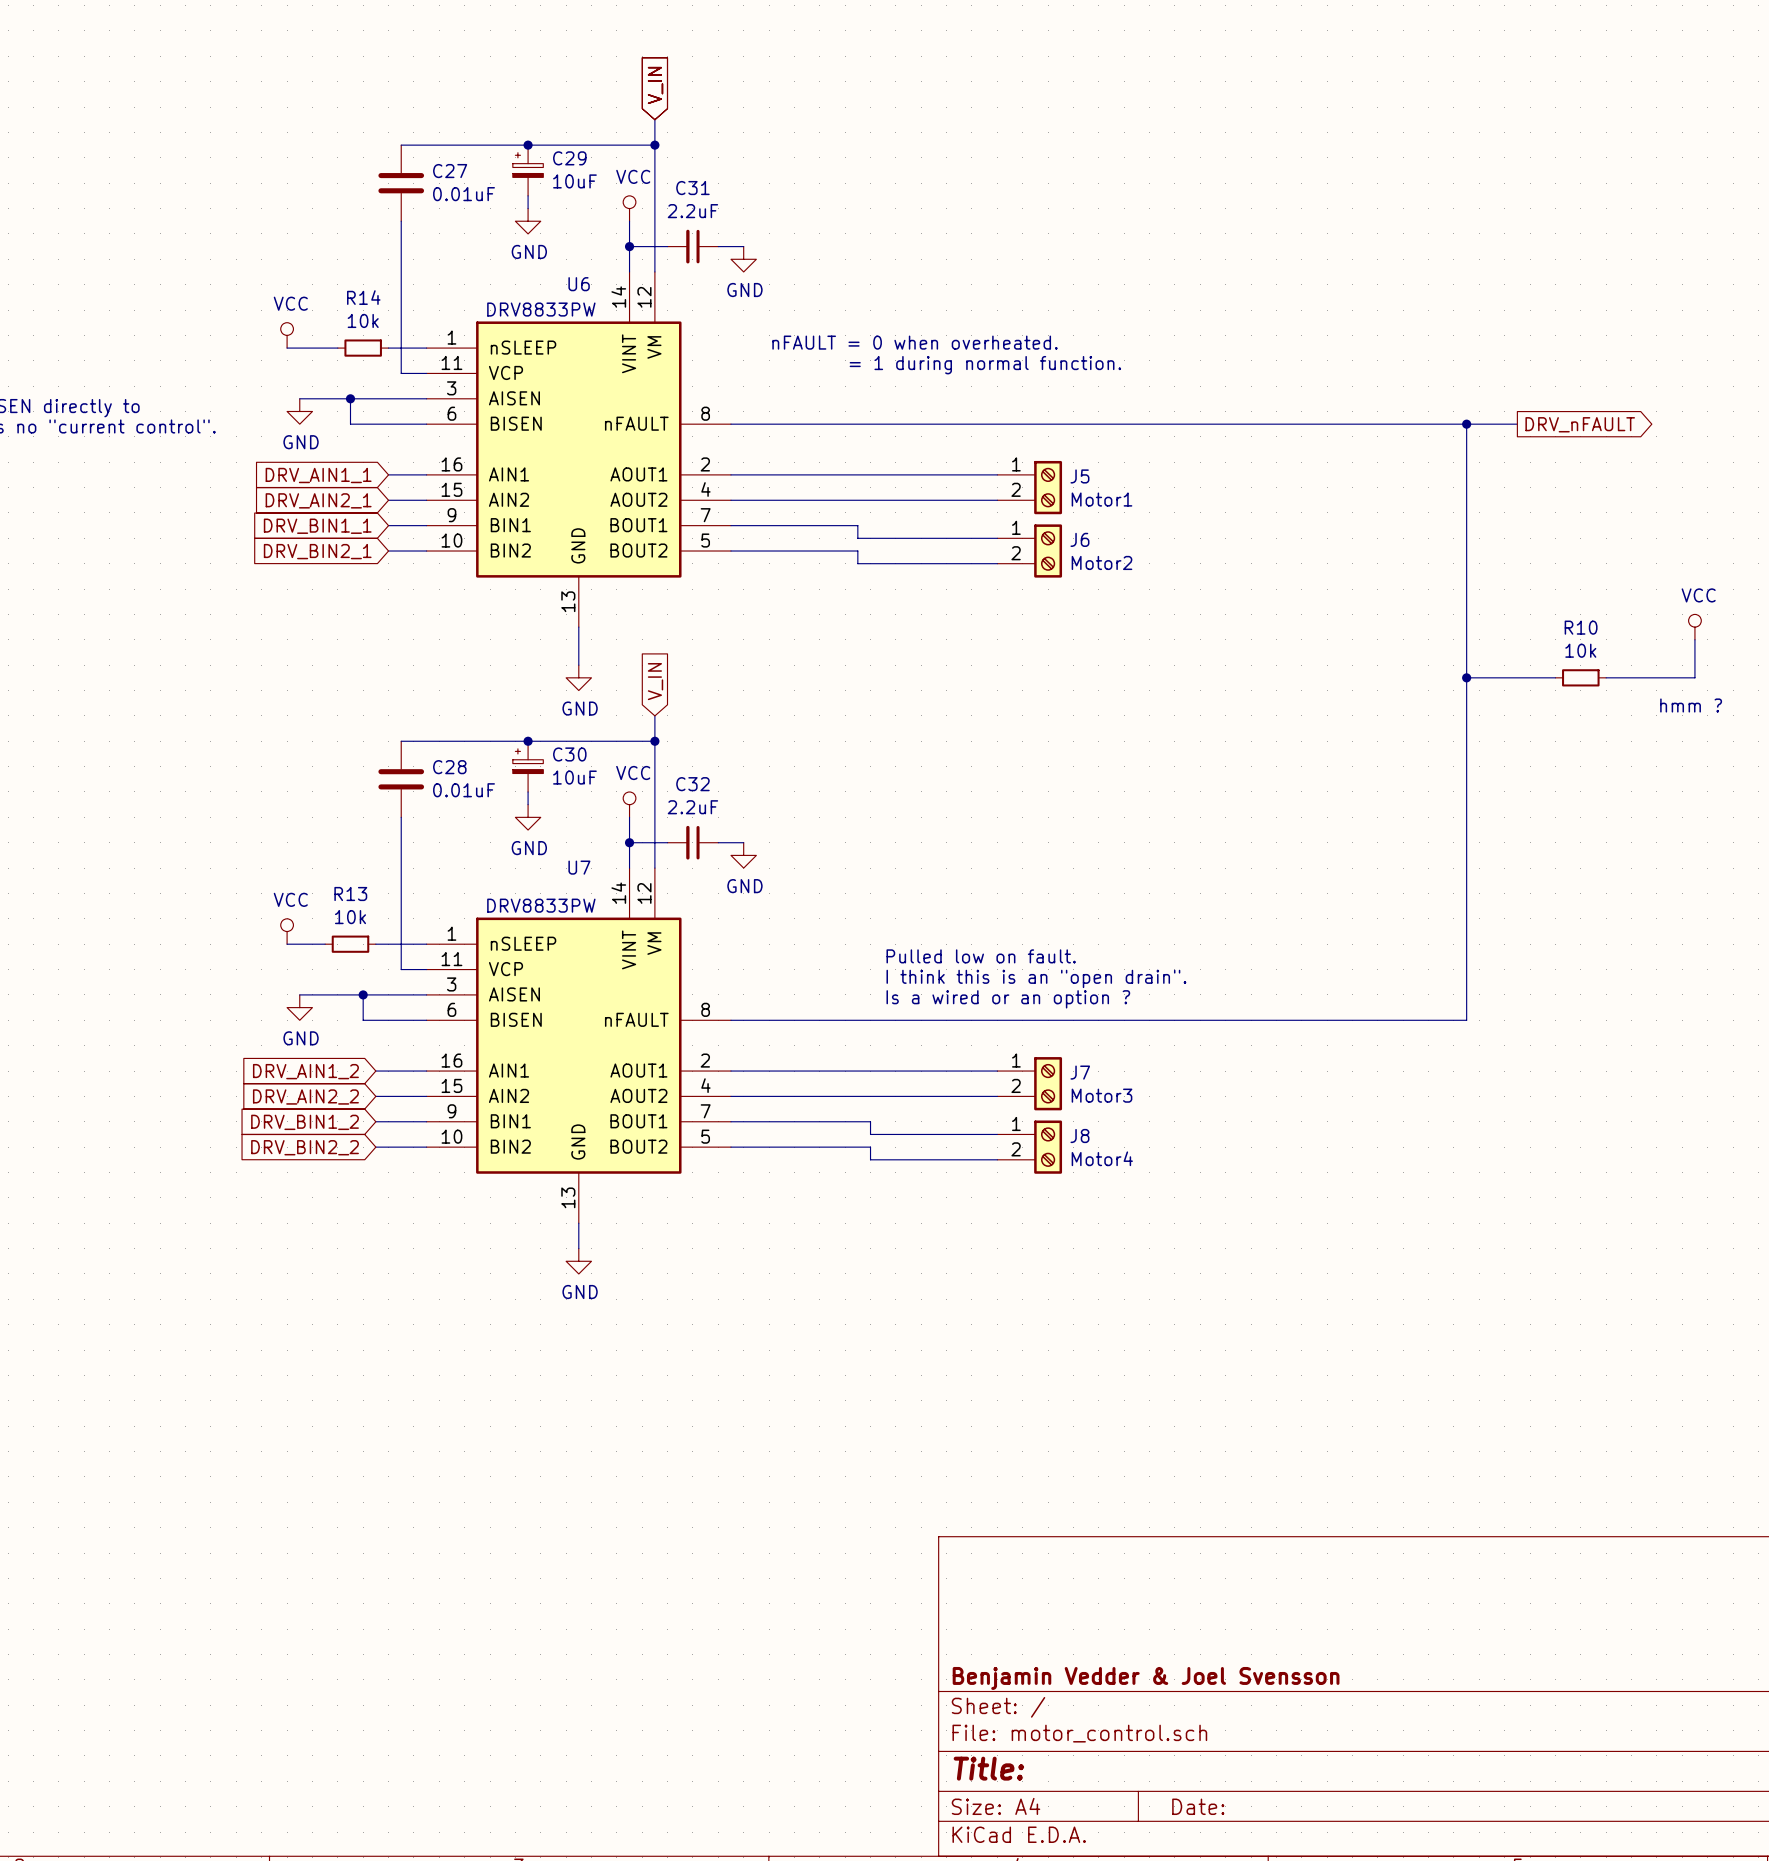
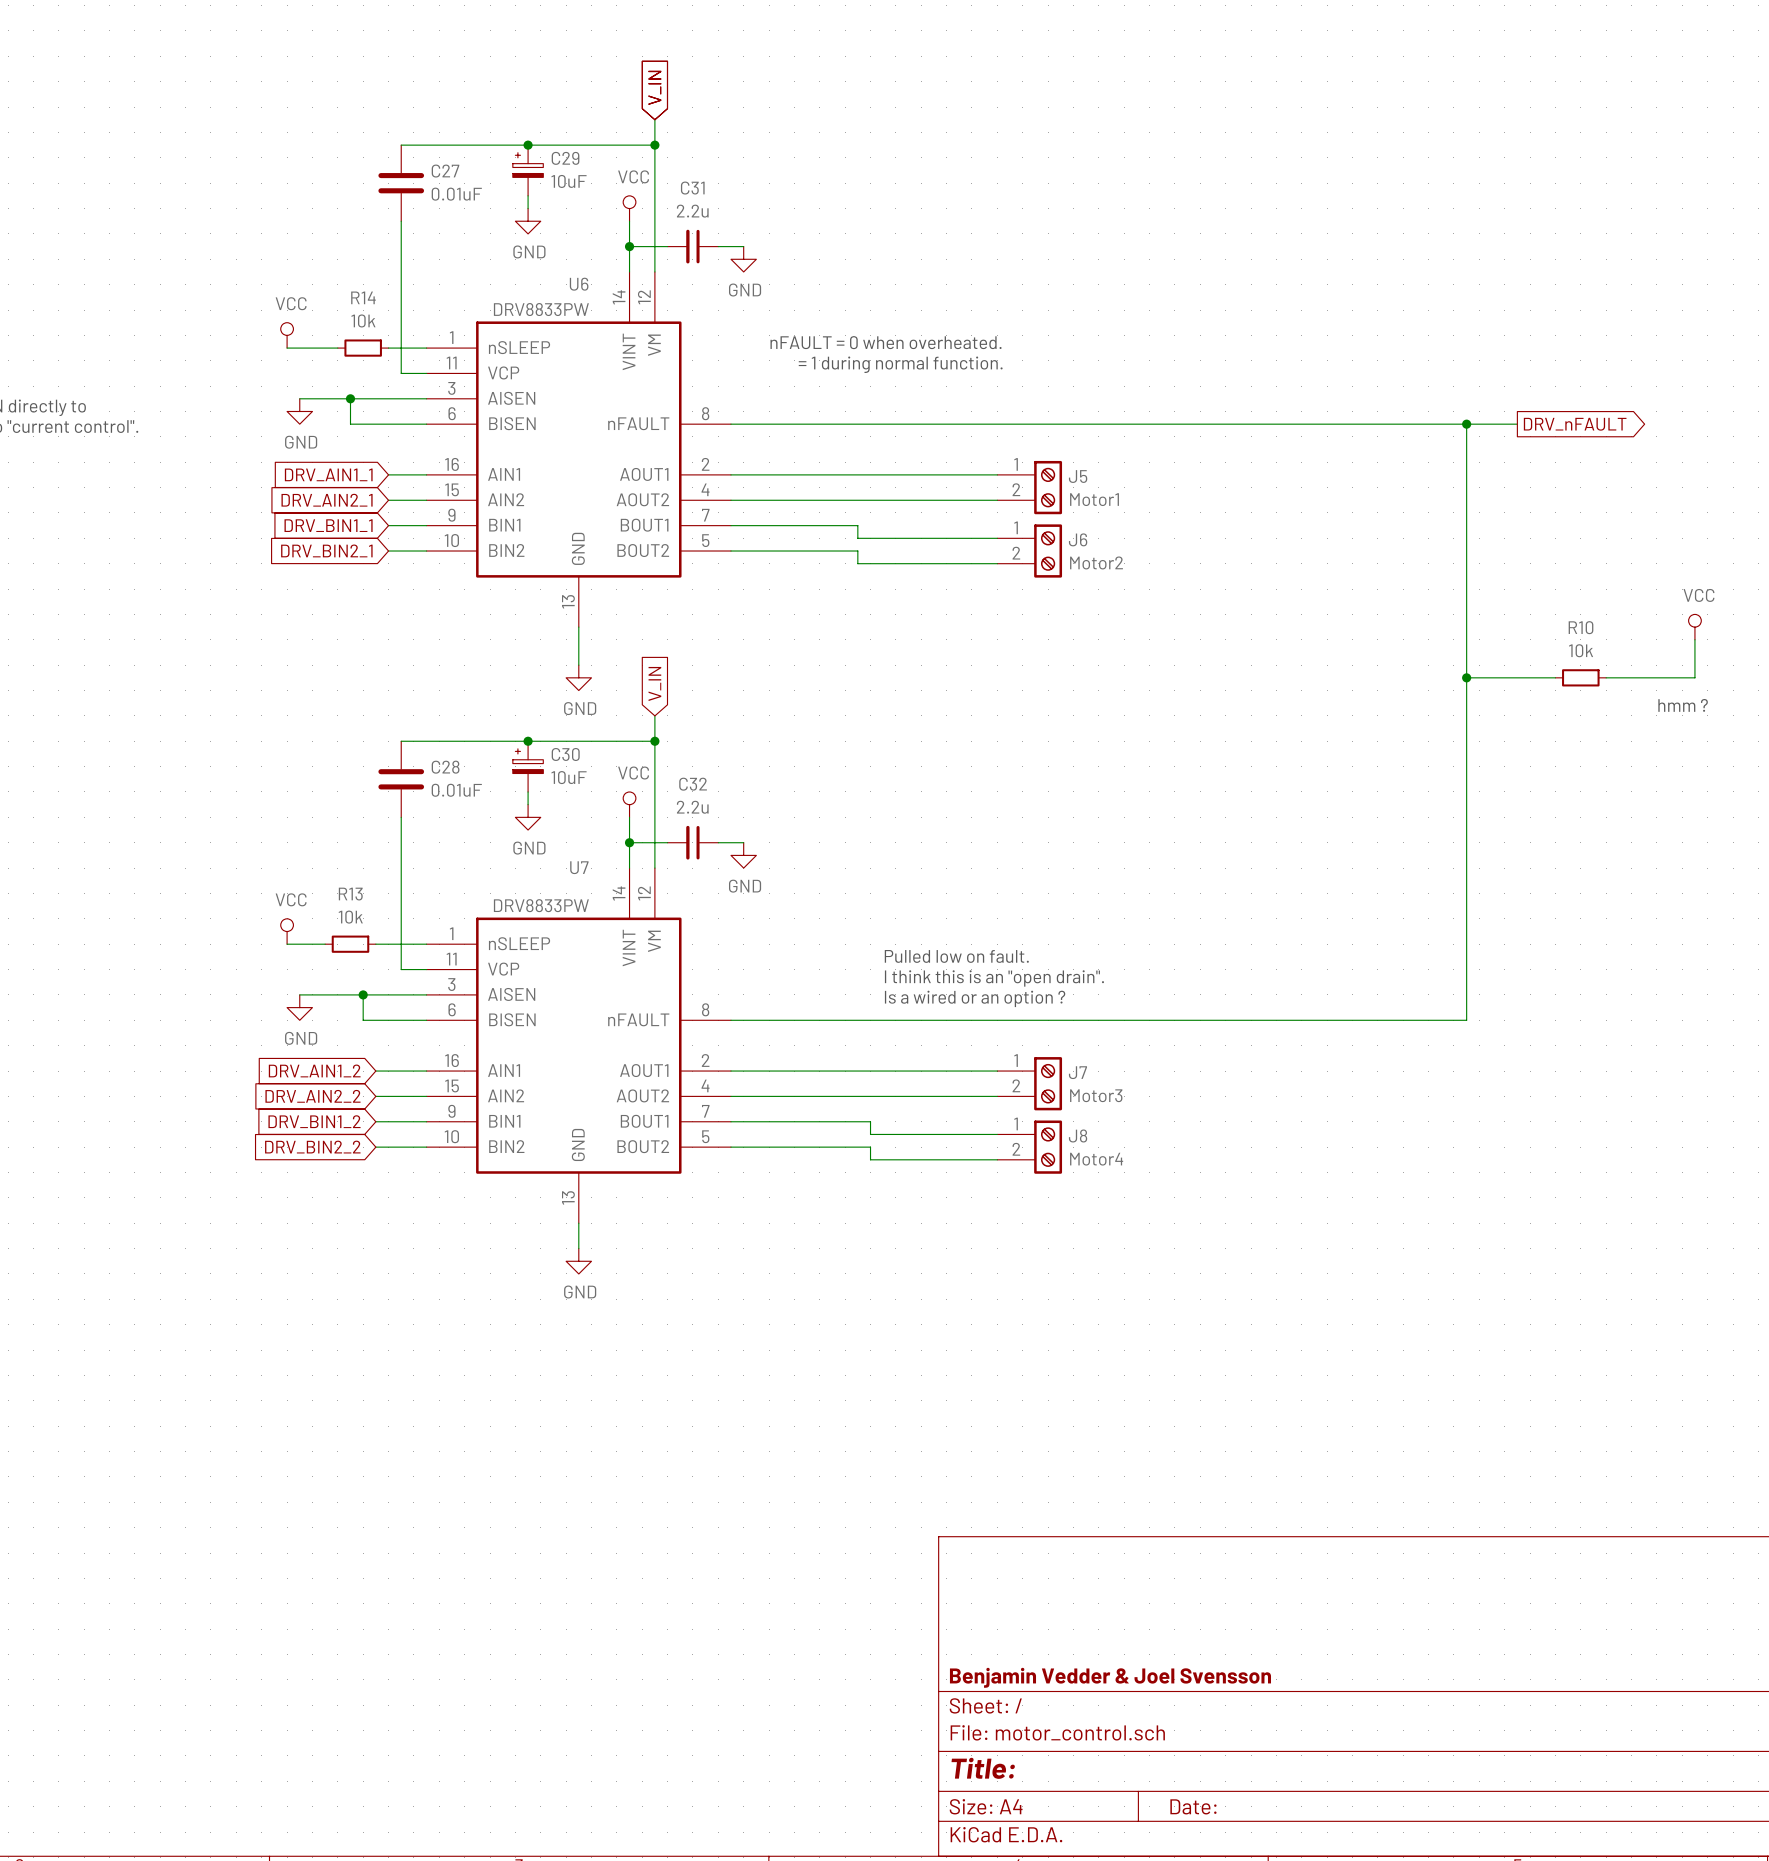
C31 value: 2.2uF (692, 211) -> 2.2u (692, 211)
C32 value: 2.2uF (692, 807) -> 2.2u (692, 807)

